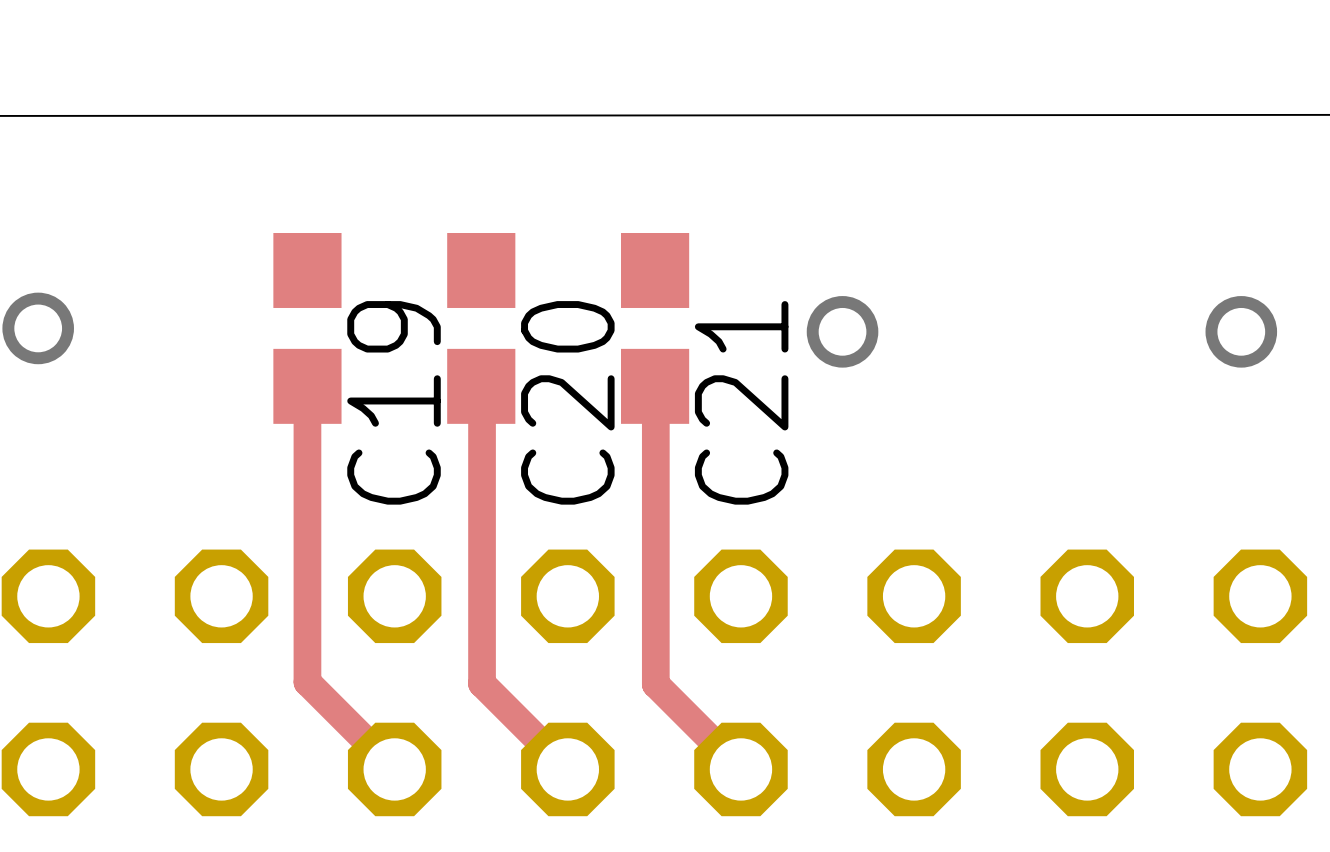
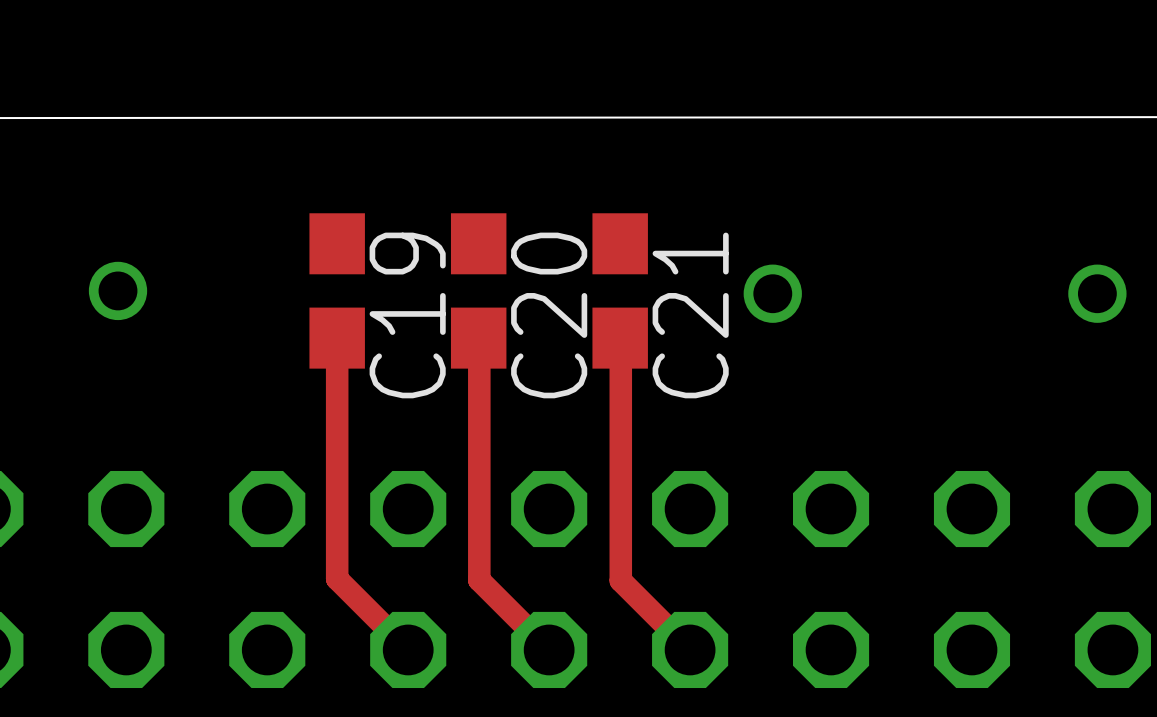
C19 name position: C19 (394, 402) -> C19 (407, 315)
C20 name position: C20 (567, 402) -> C20 (549, 315)
C21 name position: C21 (741, 402) -> C21 (690, 315)

